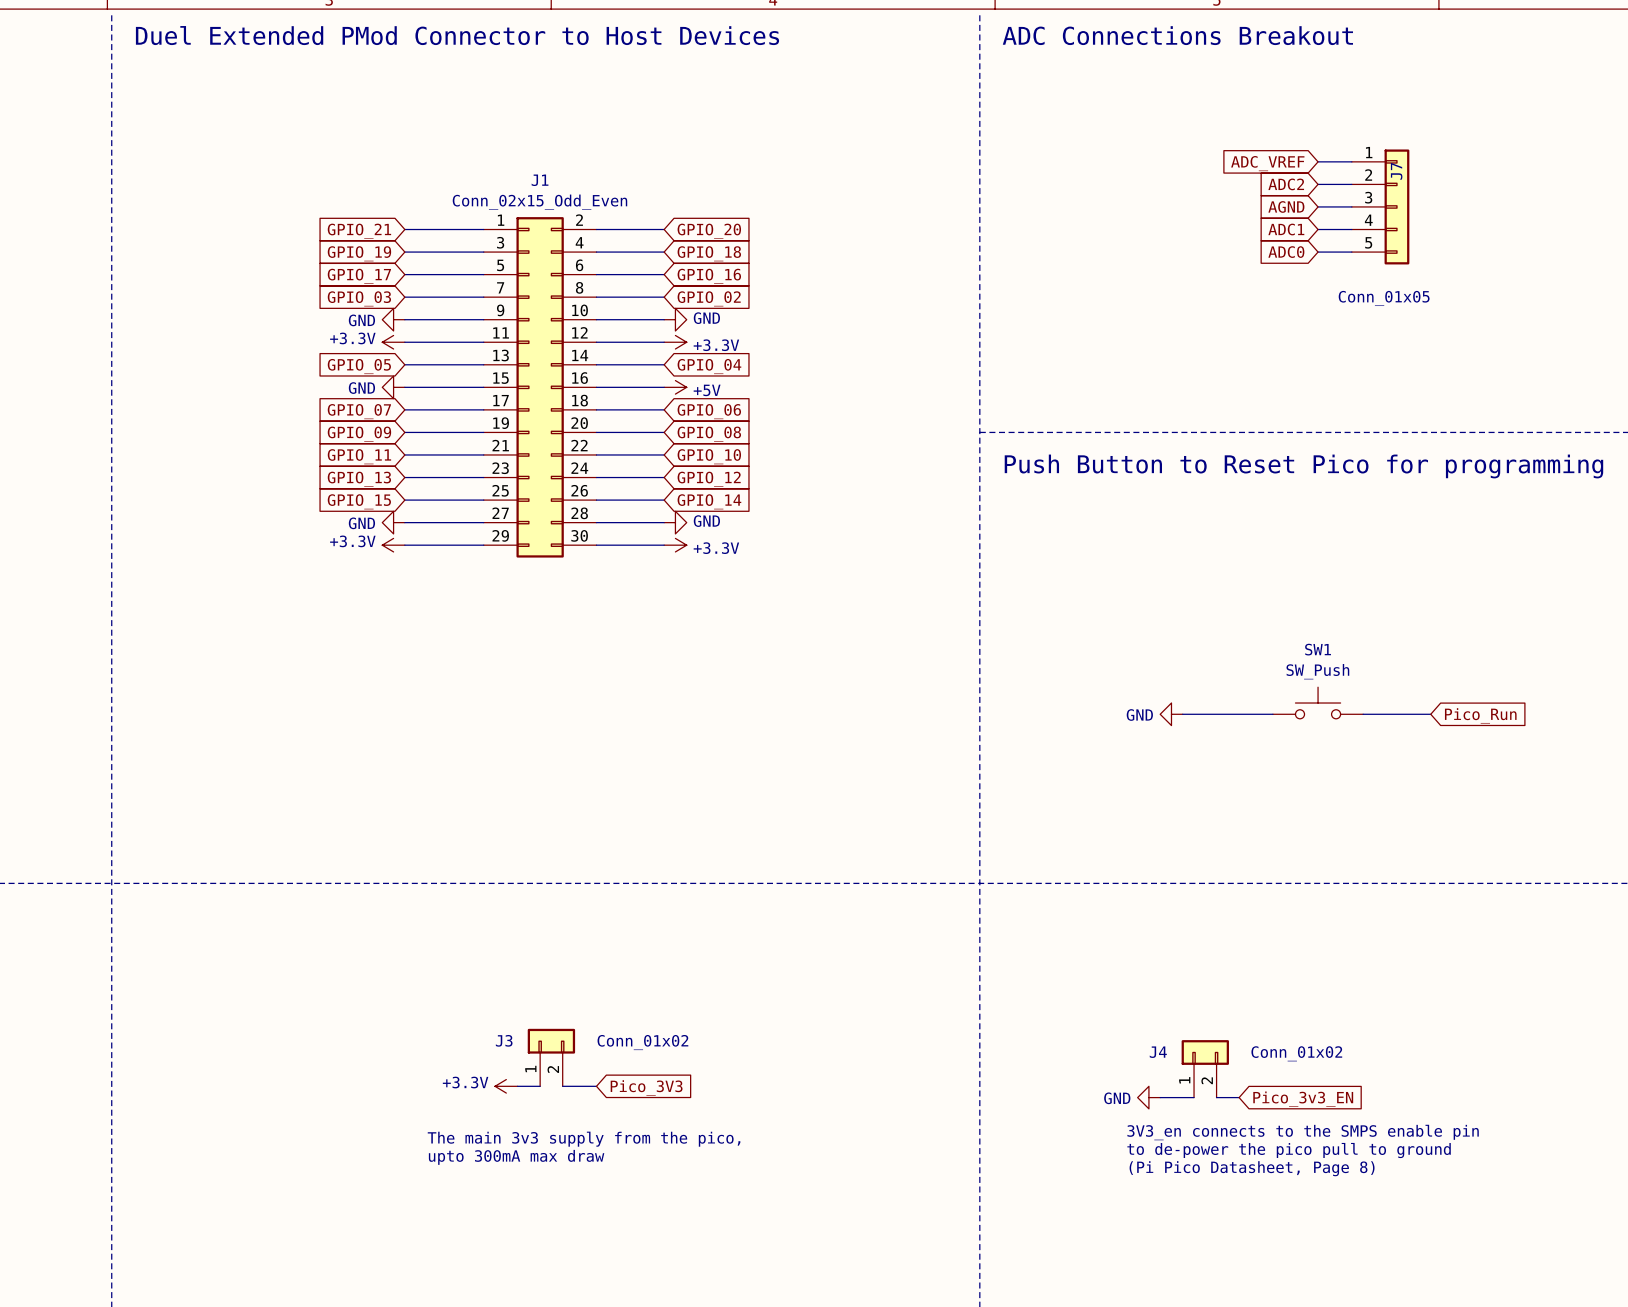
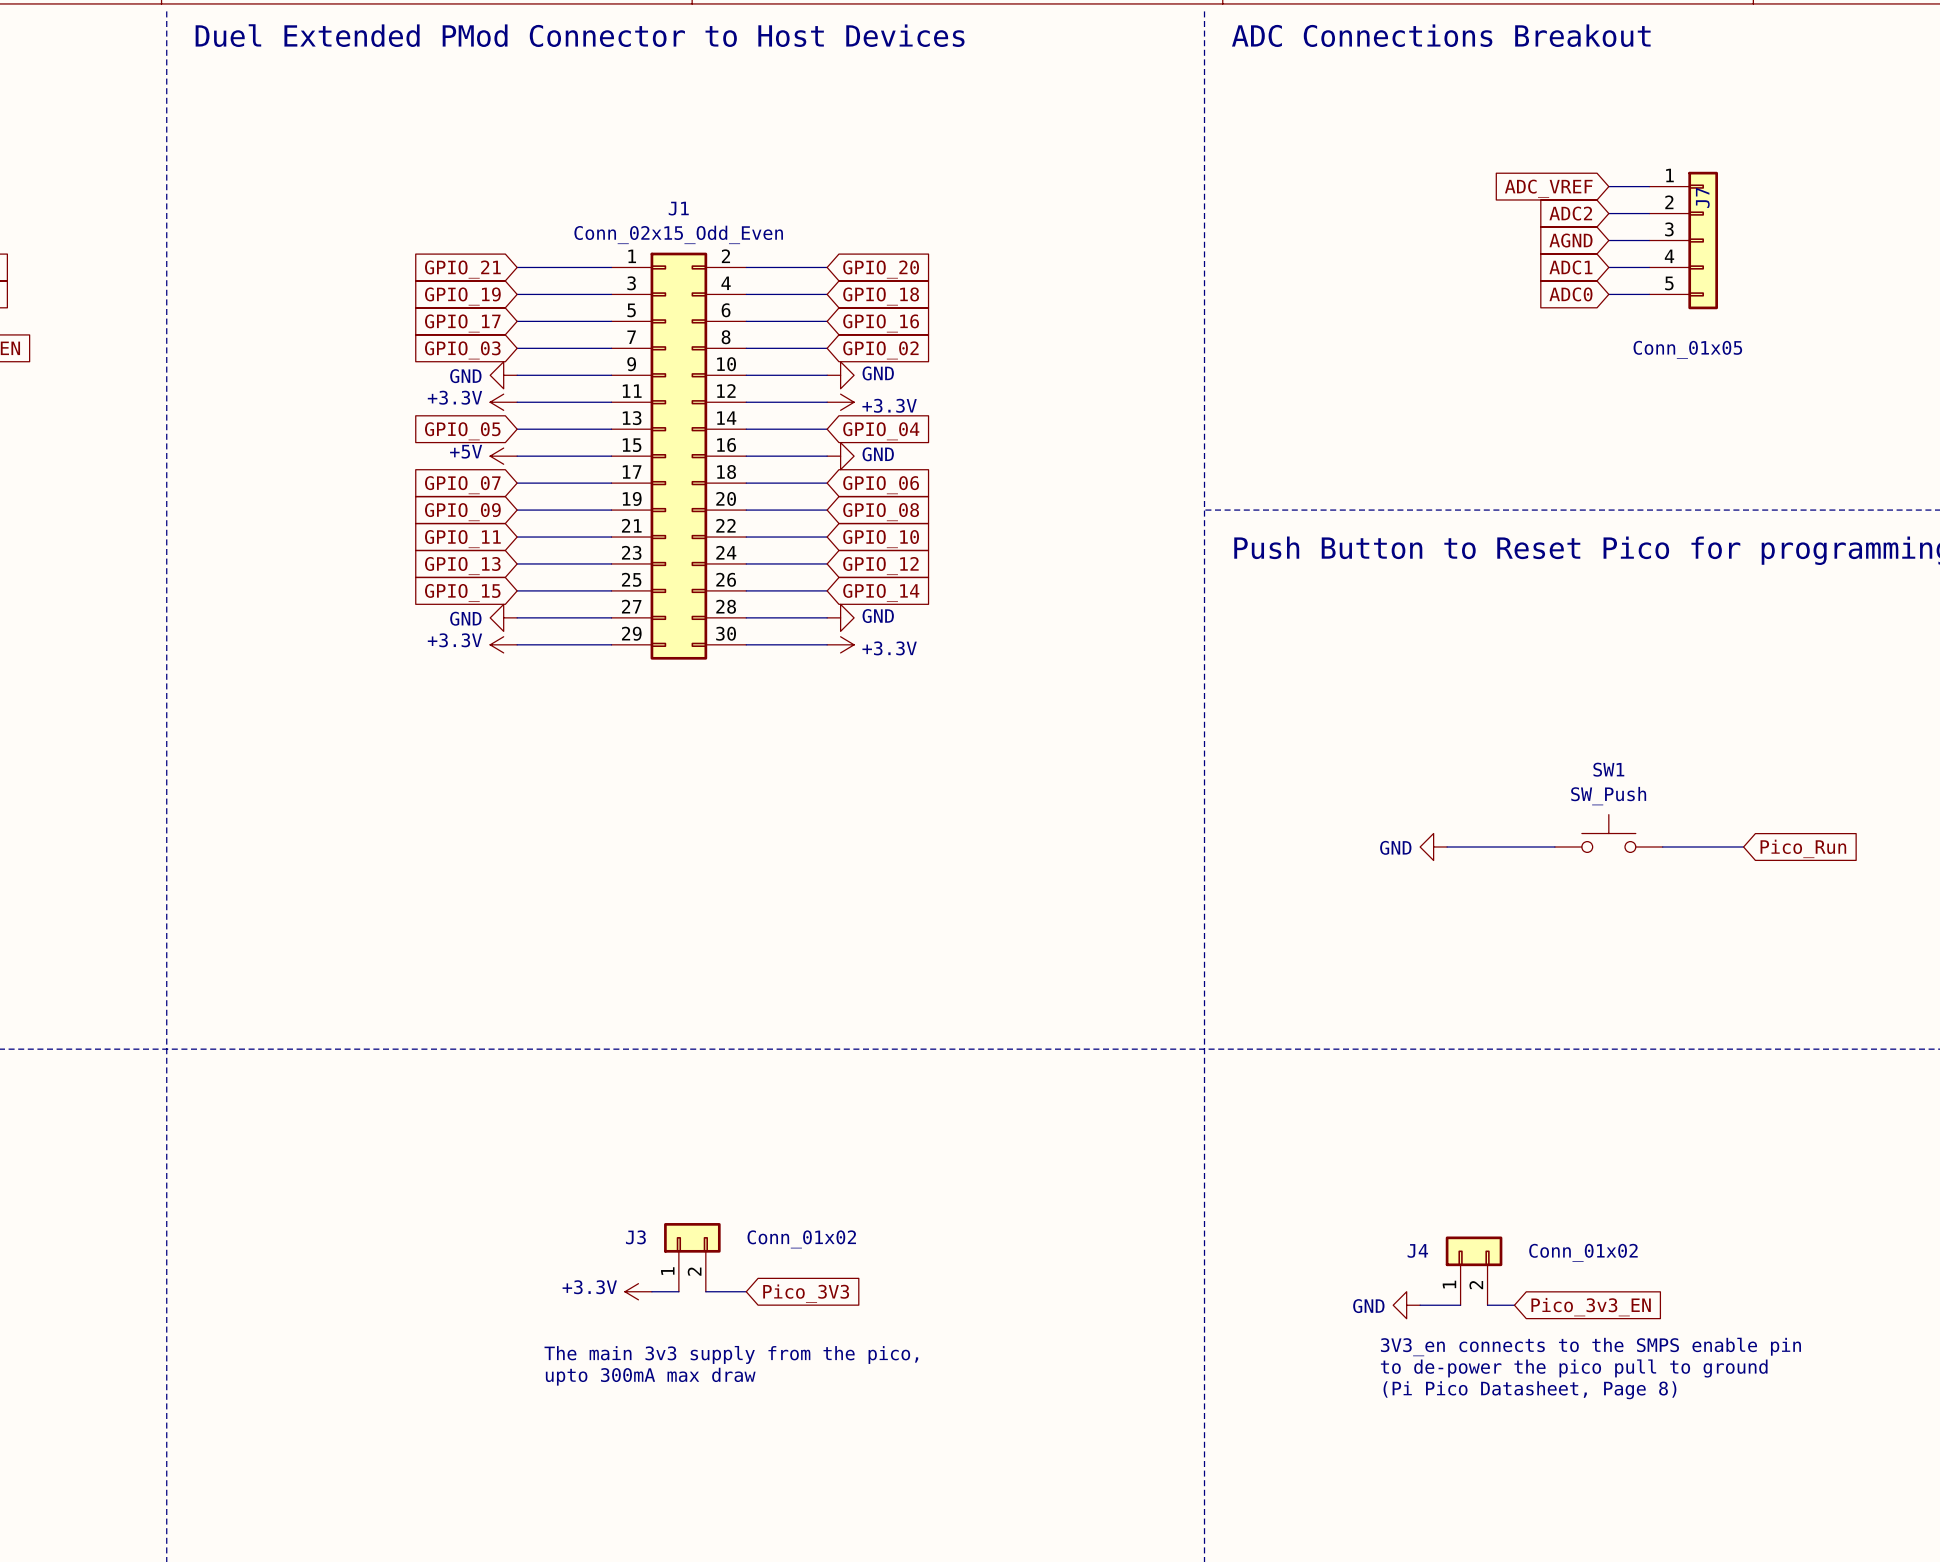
power symbol: GND (393, 387) -> +5V (503, 456)
power symbol: +5V (675, 387) -> GND (840, 456)

